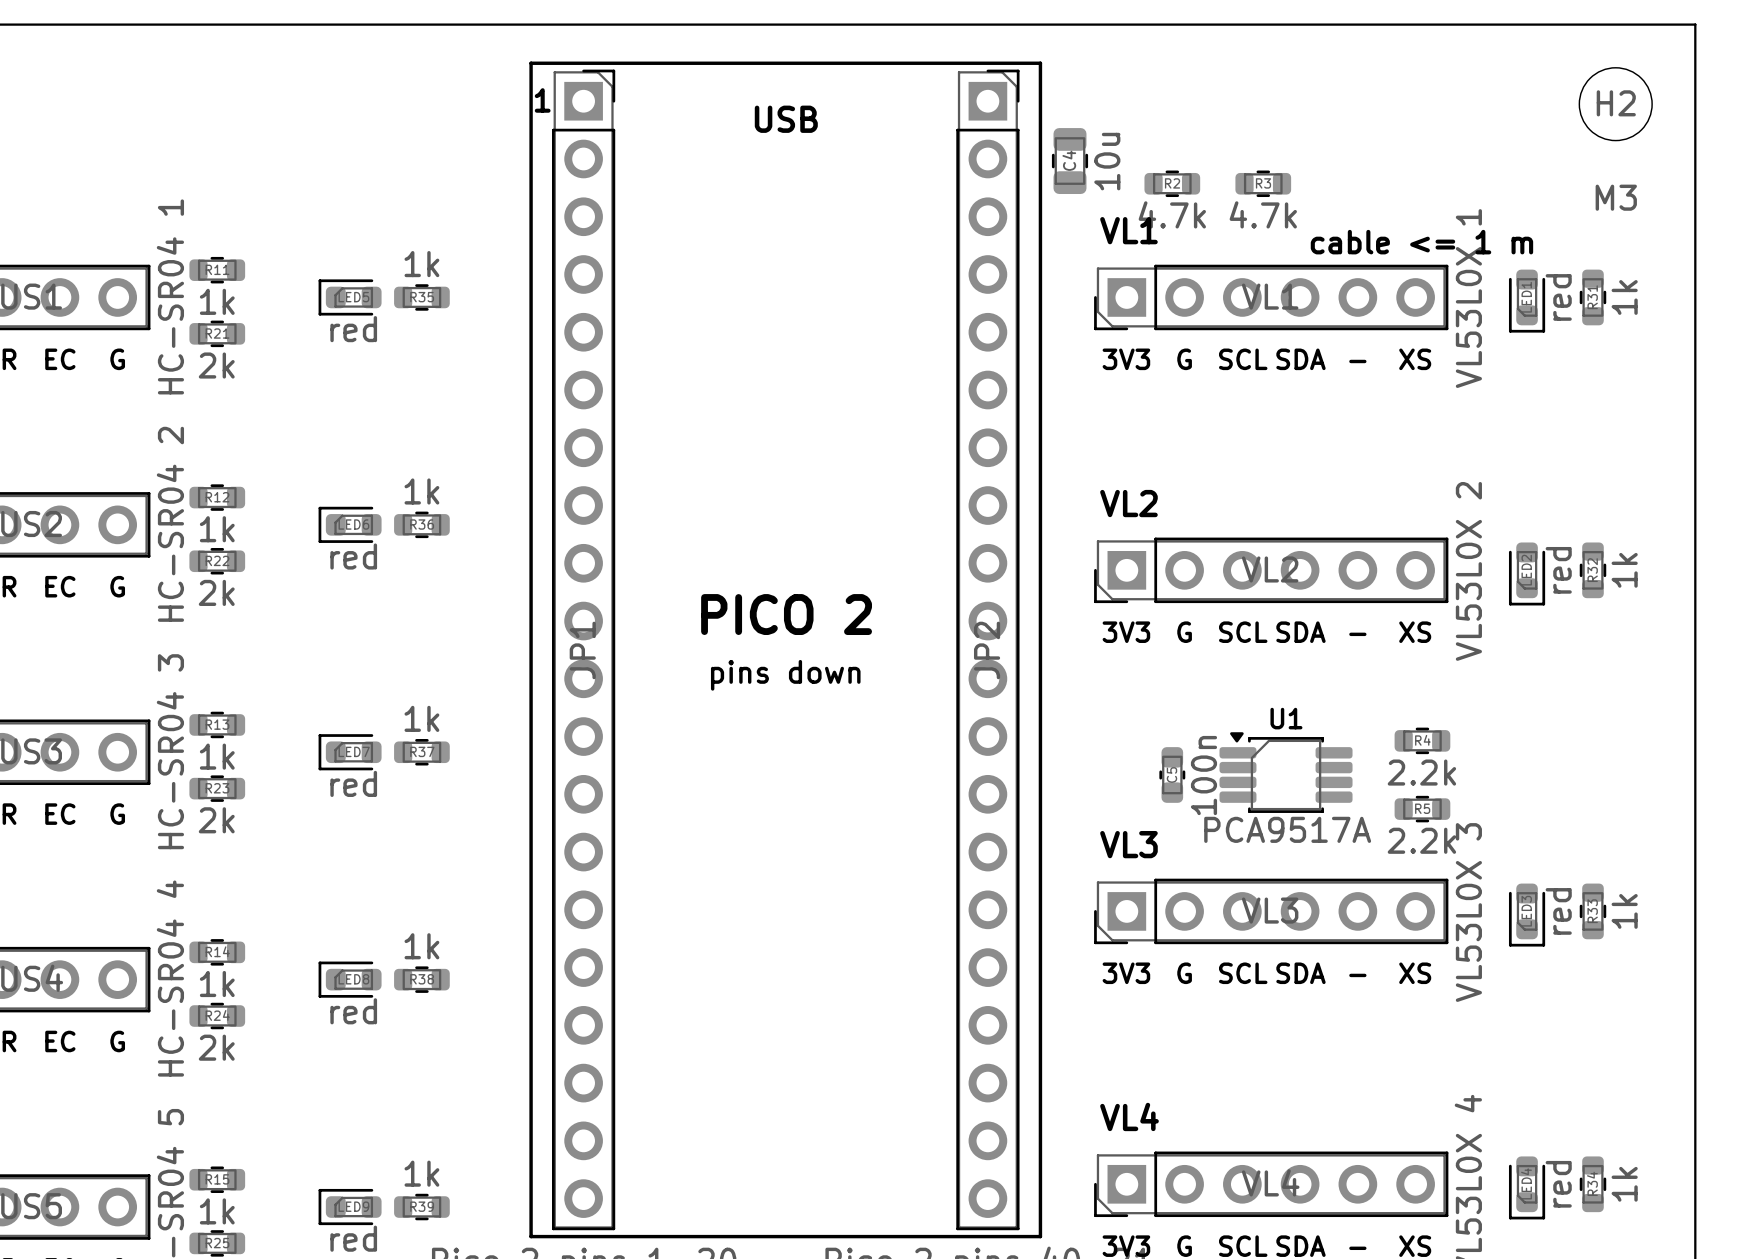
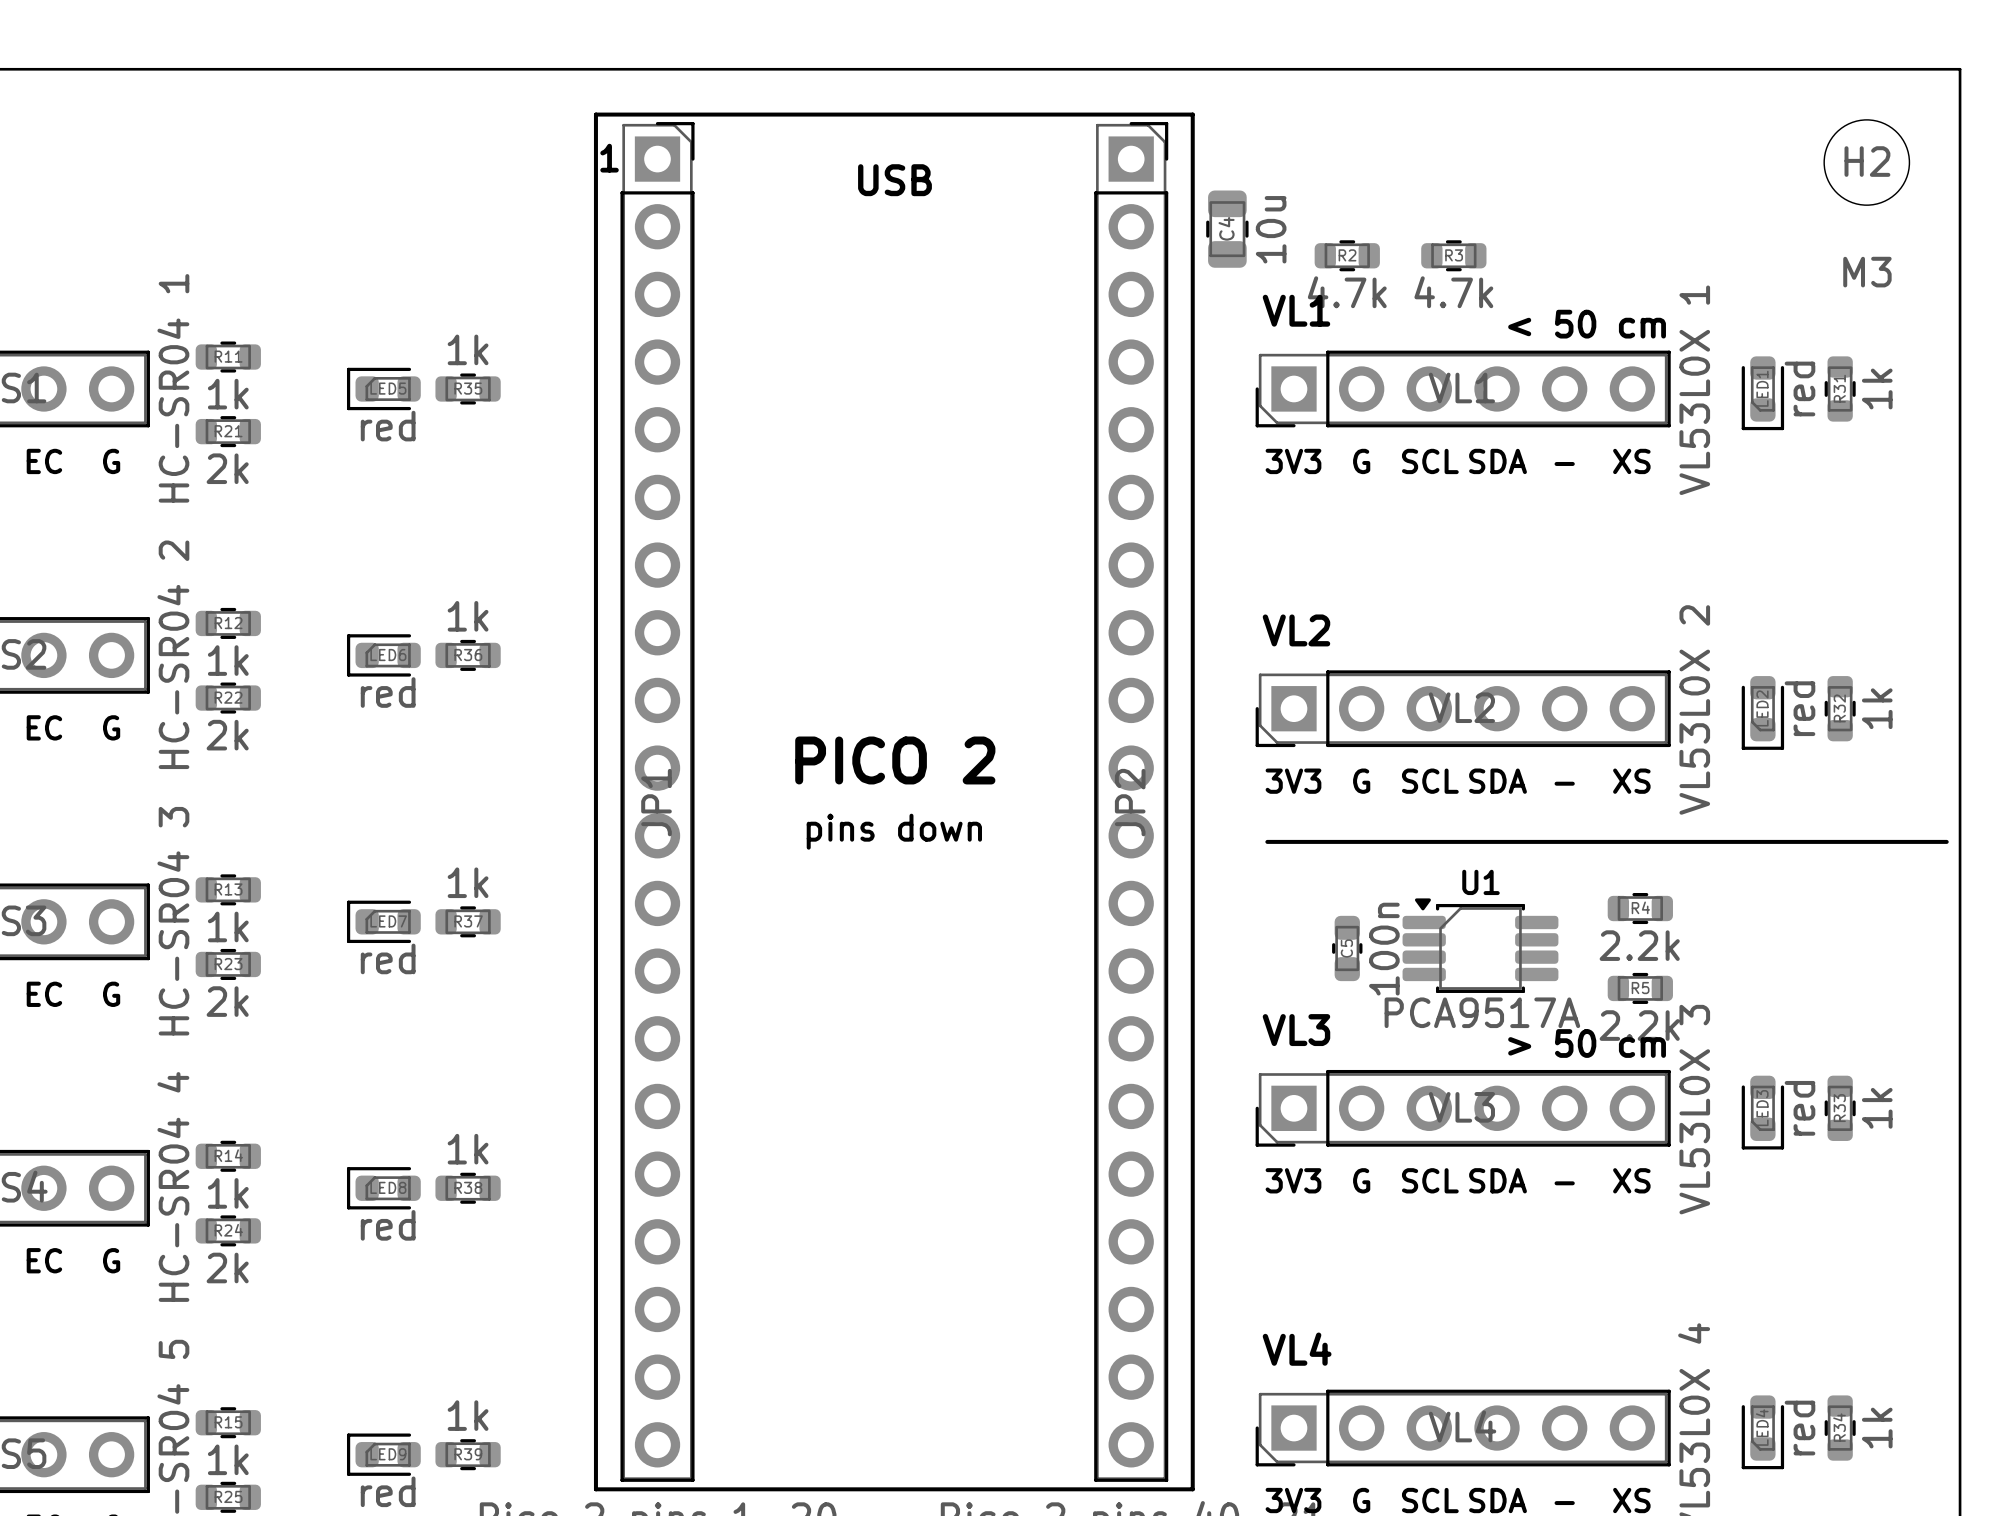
text: none -> < 50 cm (1587, 324)
text: cable <= 1 m (1421, 242) -> none
line: none -> (1267, 841) (1946, 841)
text: none -> > 50 cm (1587, 1043)

